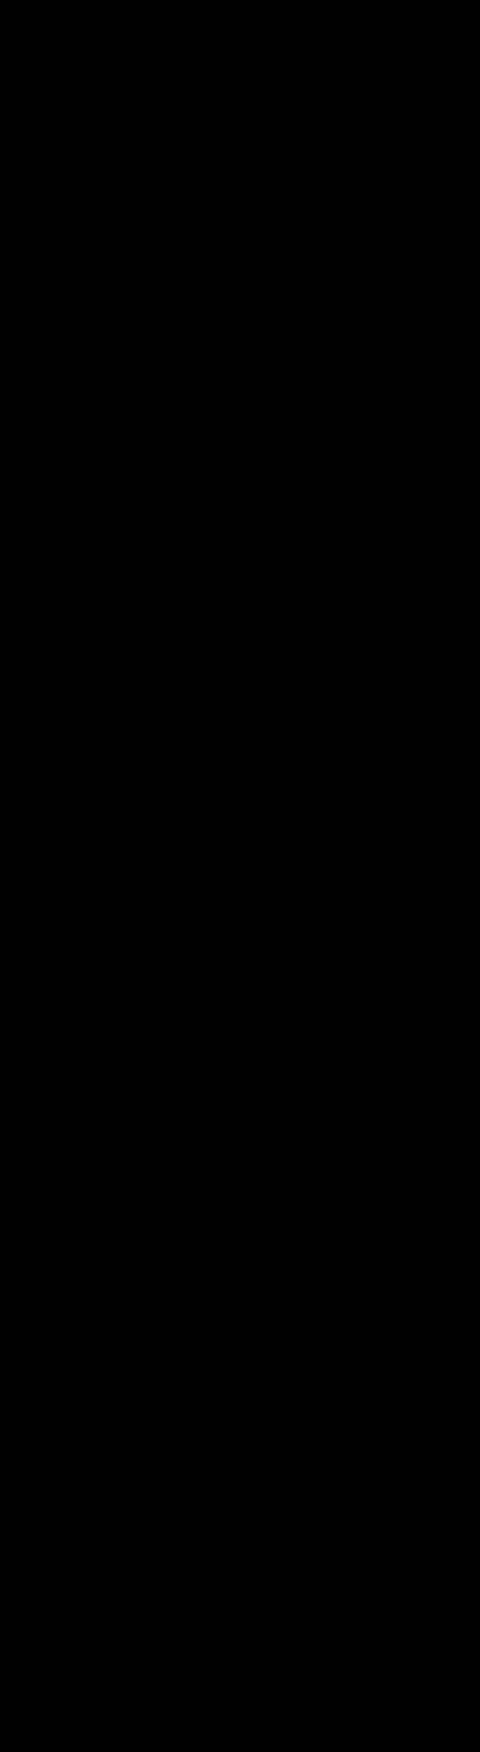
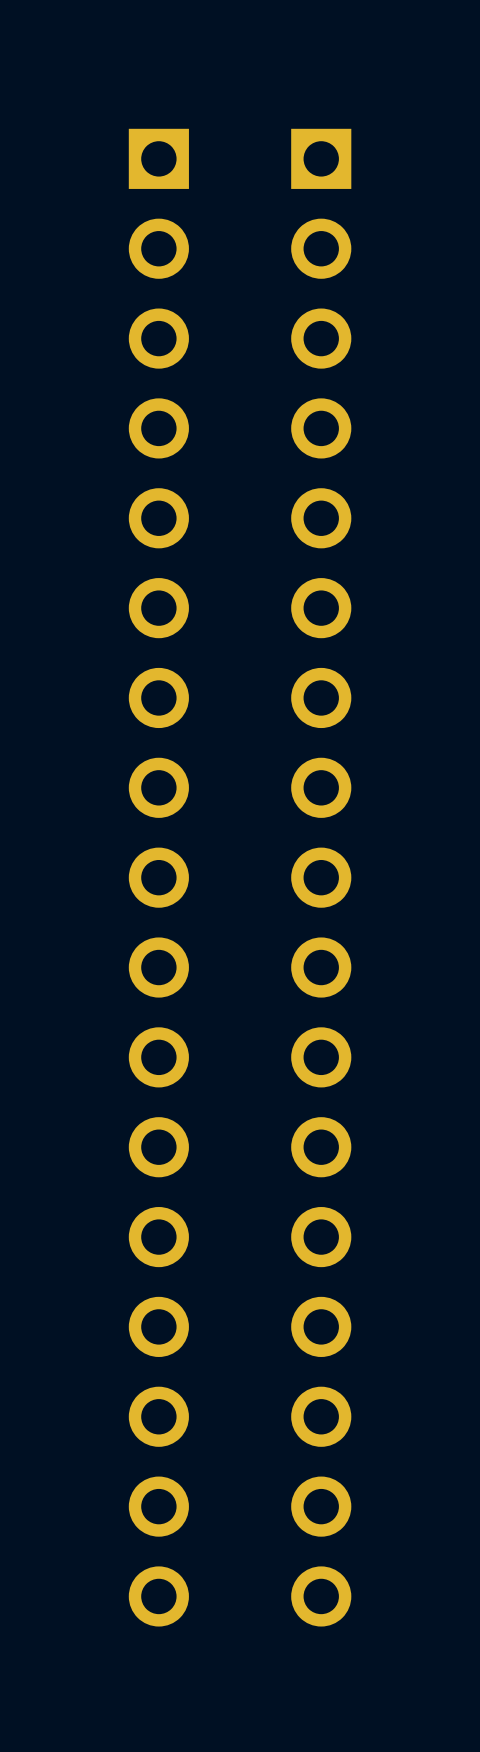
part: none -> (158, 877)
part: none -> (321, 877)

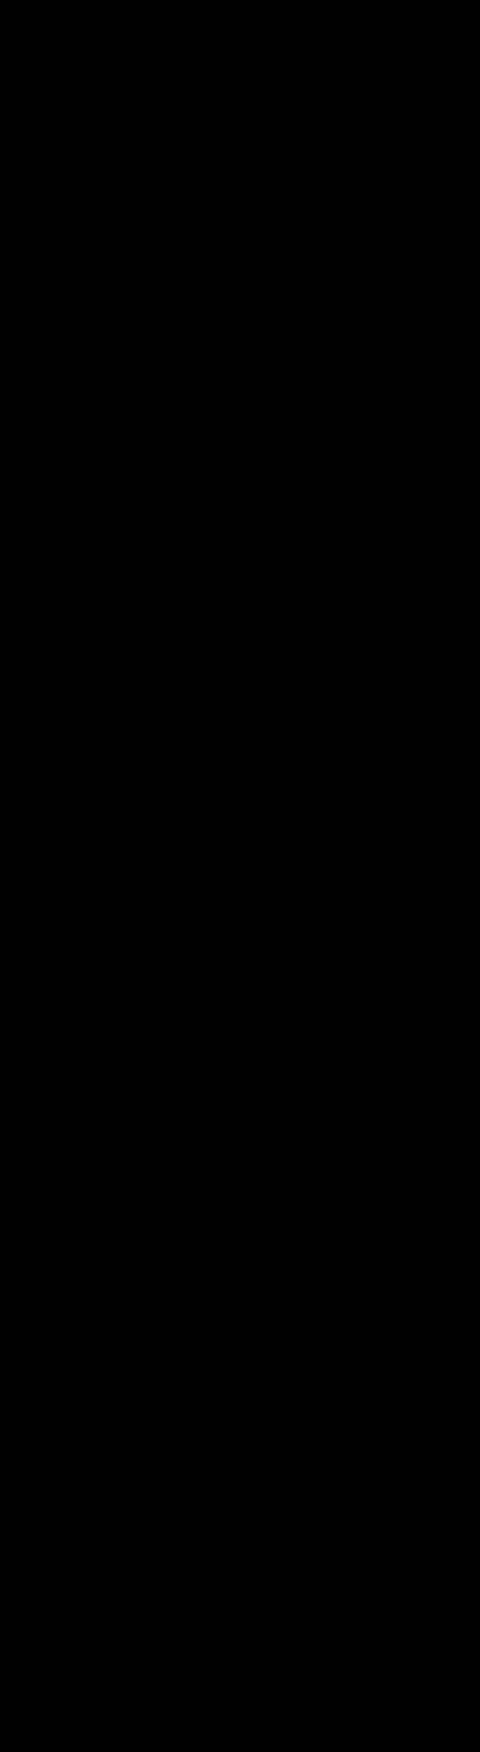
part: (158, 877) -> none
part: (321, 877) -> none

